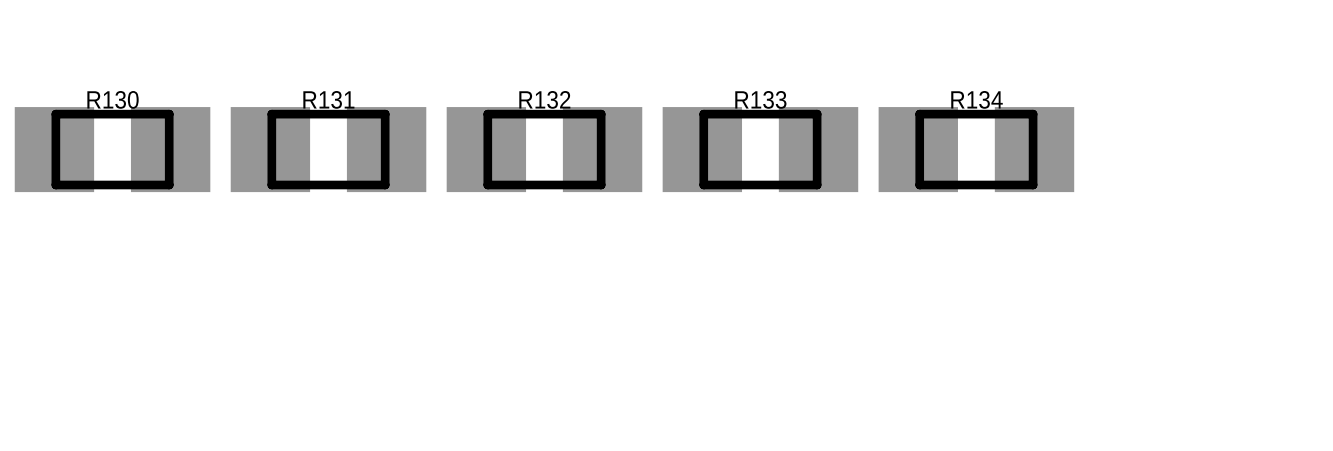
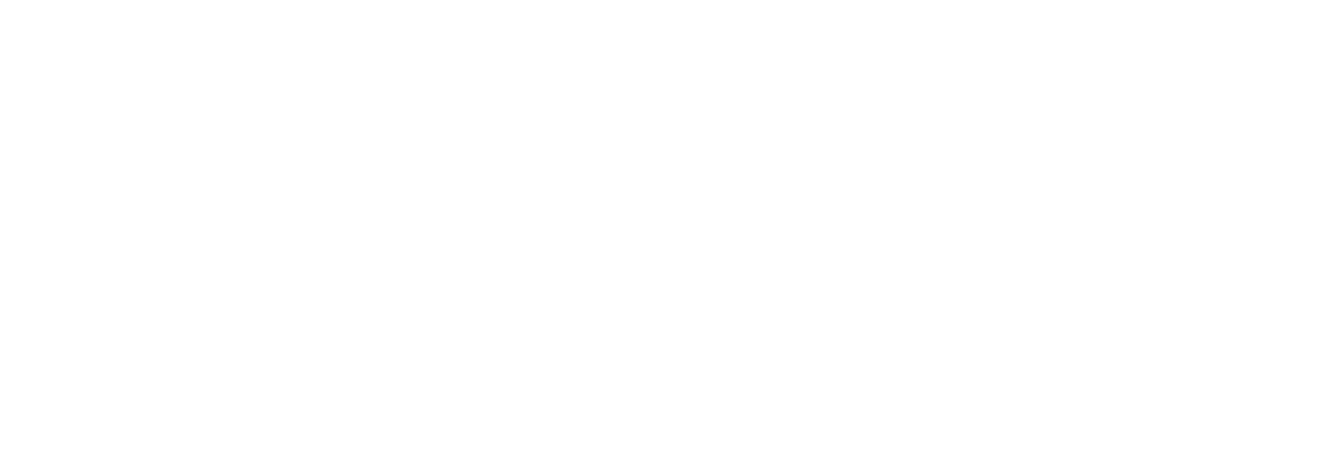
R130: (112, 149) -> none
R131: (328, 149) -> none
R132: (544, 149) -> none
R133: (760, 149) -> none
R134: (976, 149) -> none

